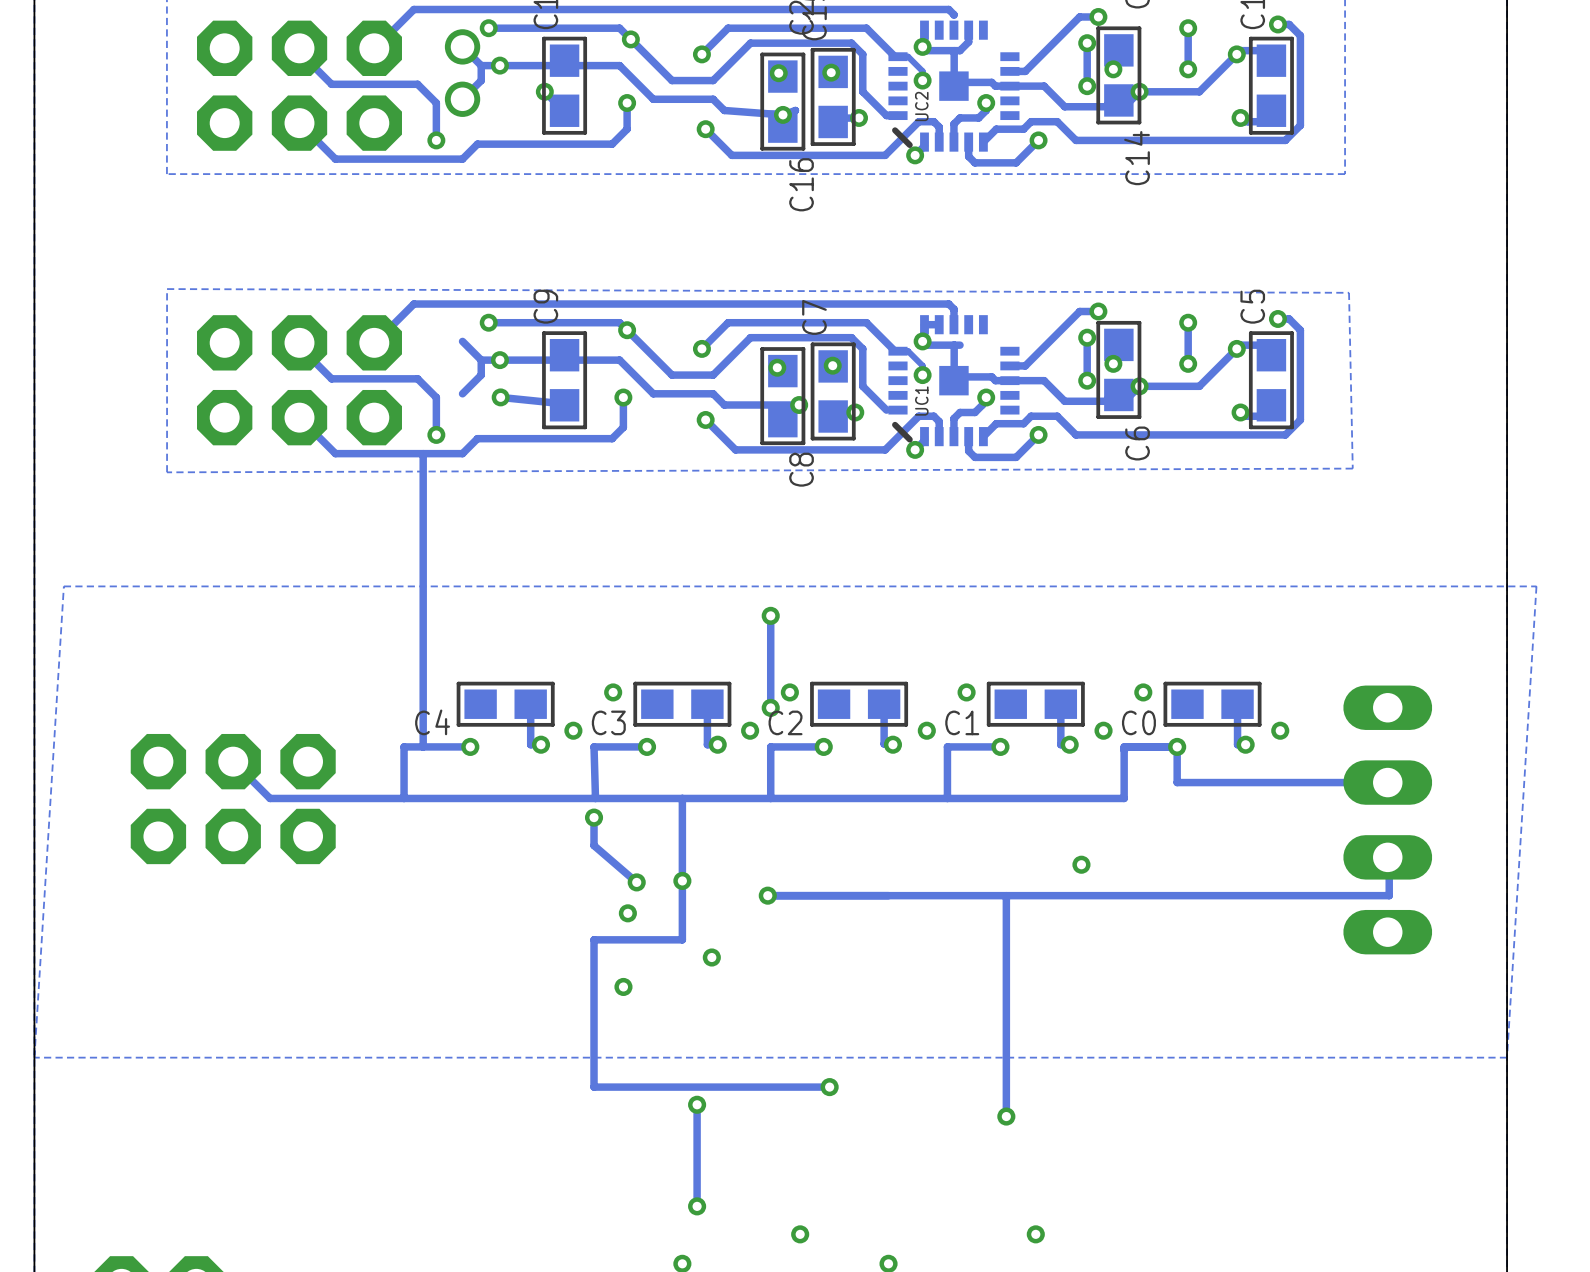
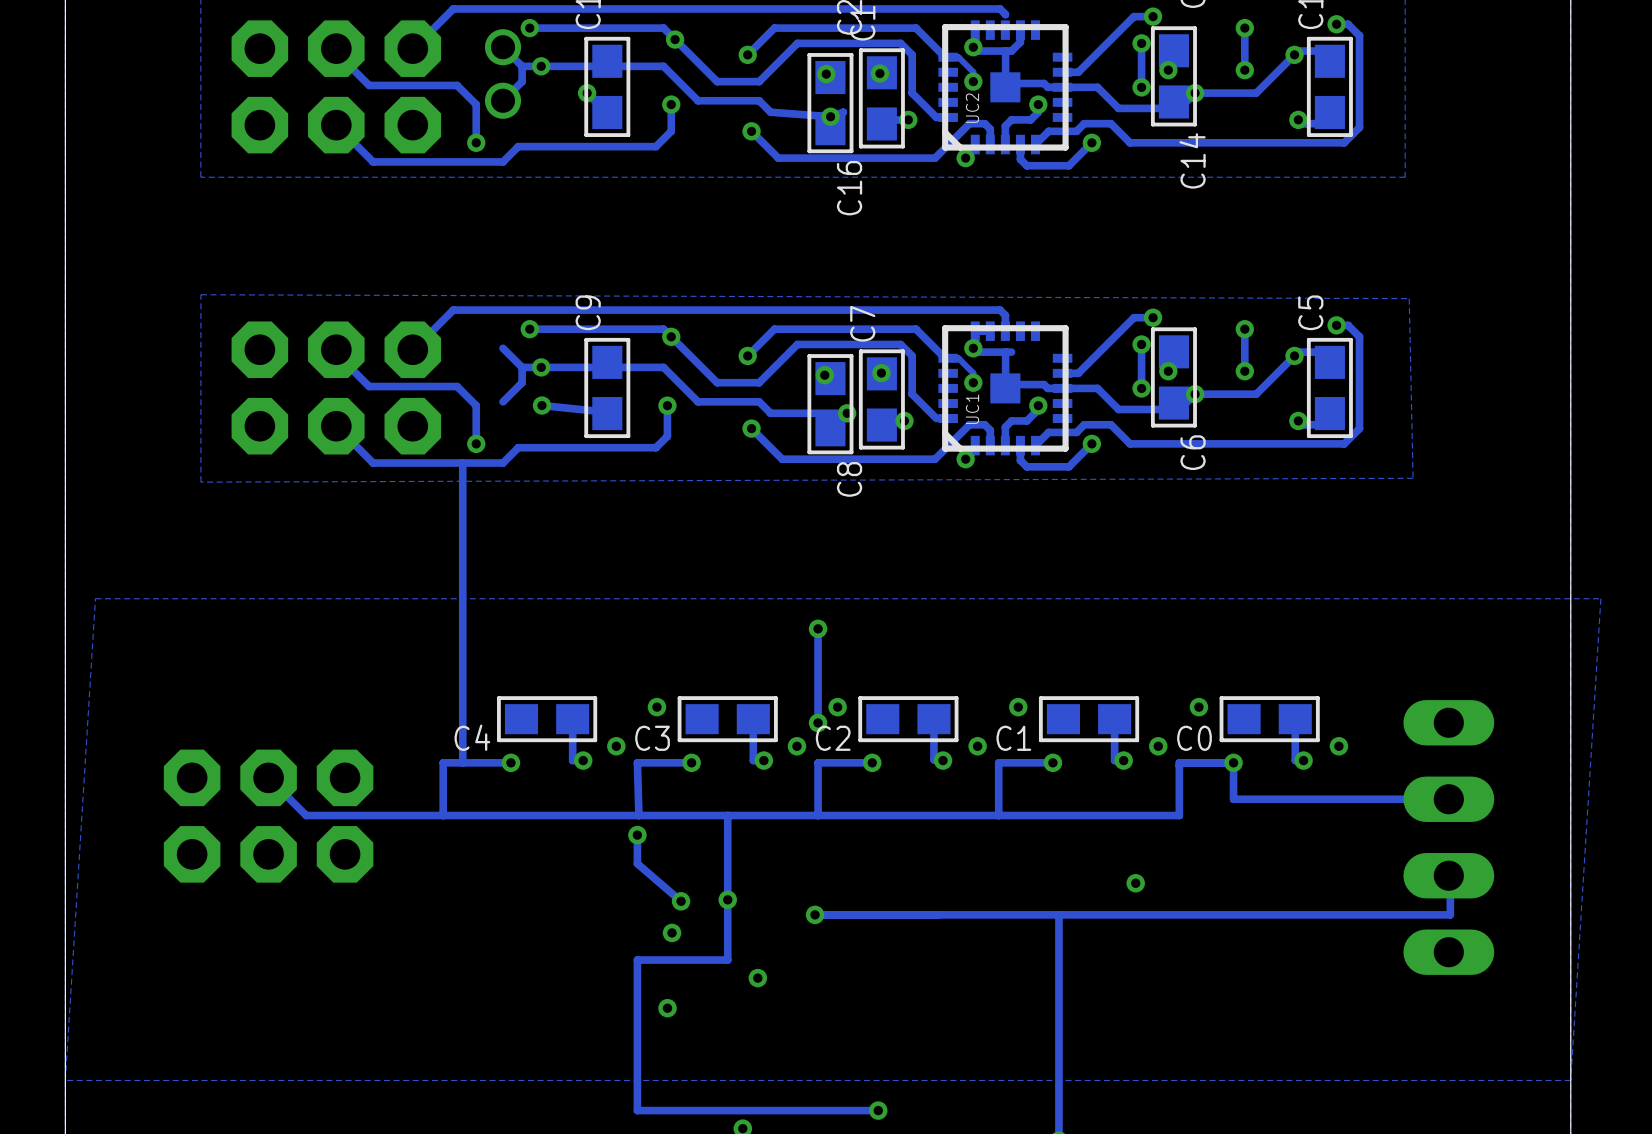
UC2 footprint: [888, 20, 1020, 152] -> [938, 20, 1073, 155]
UC1 footprint: [888, 315, 1020, 447] -> [938, 321, 1073, 456]

